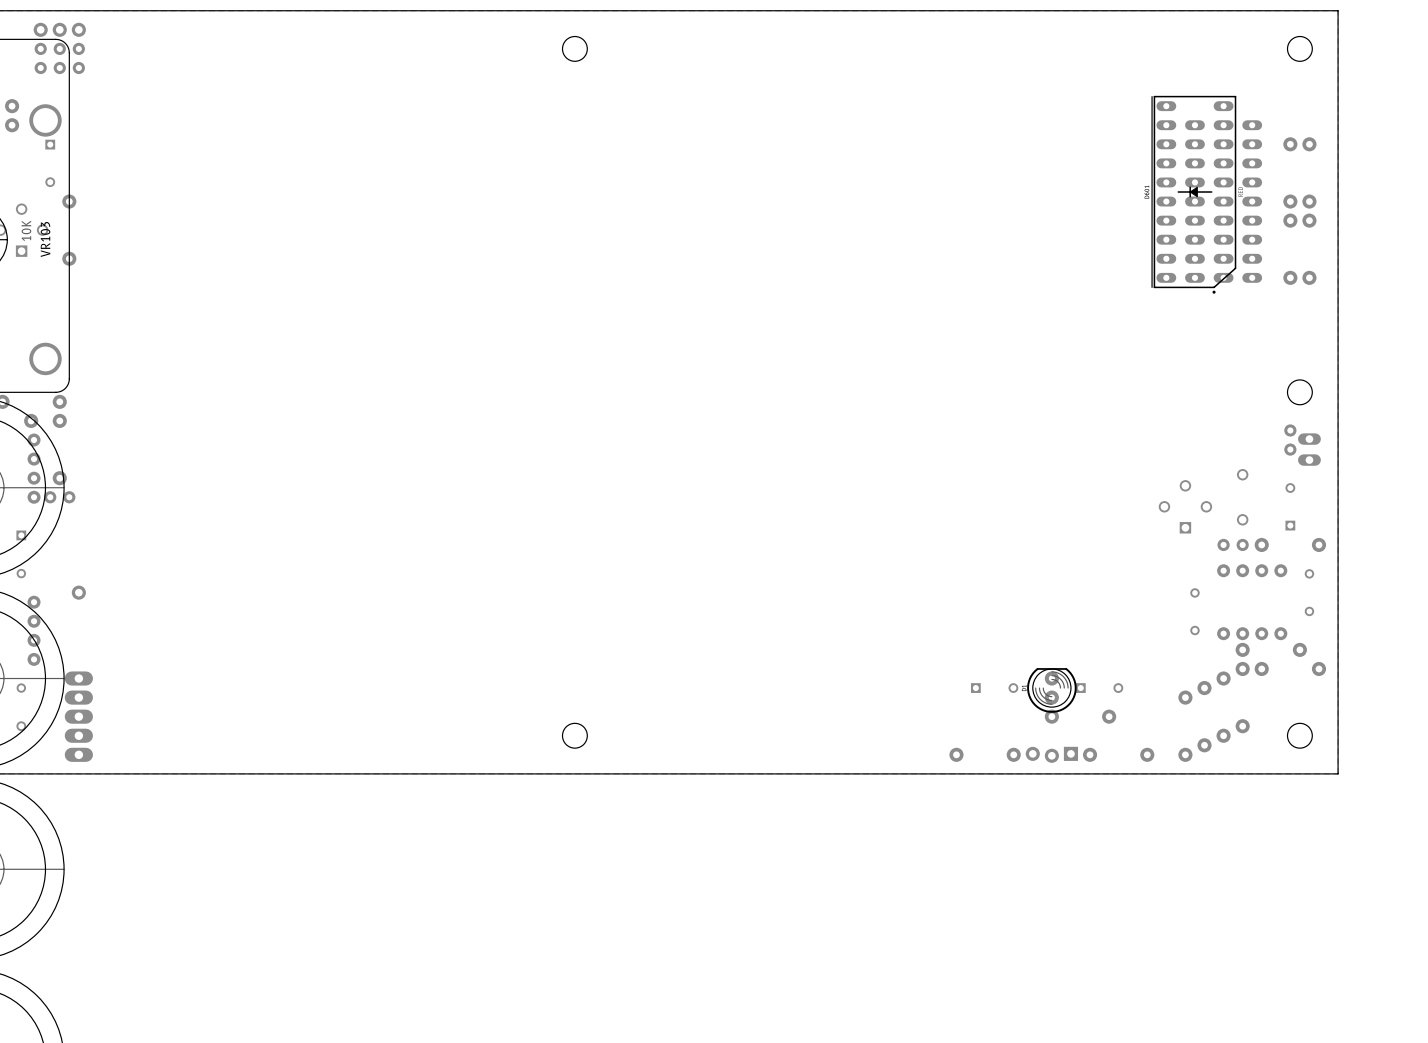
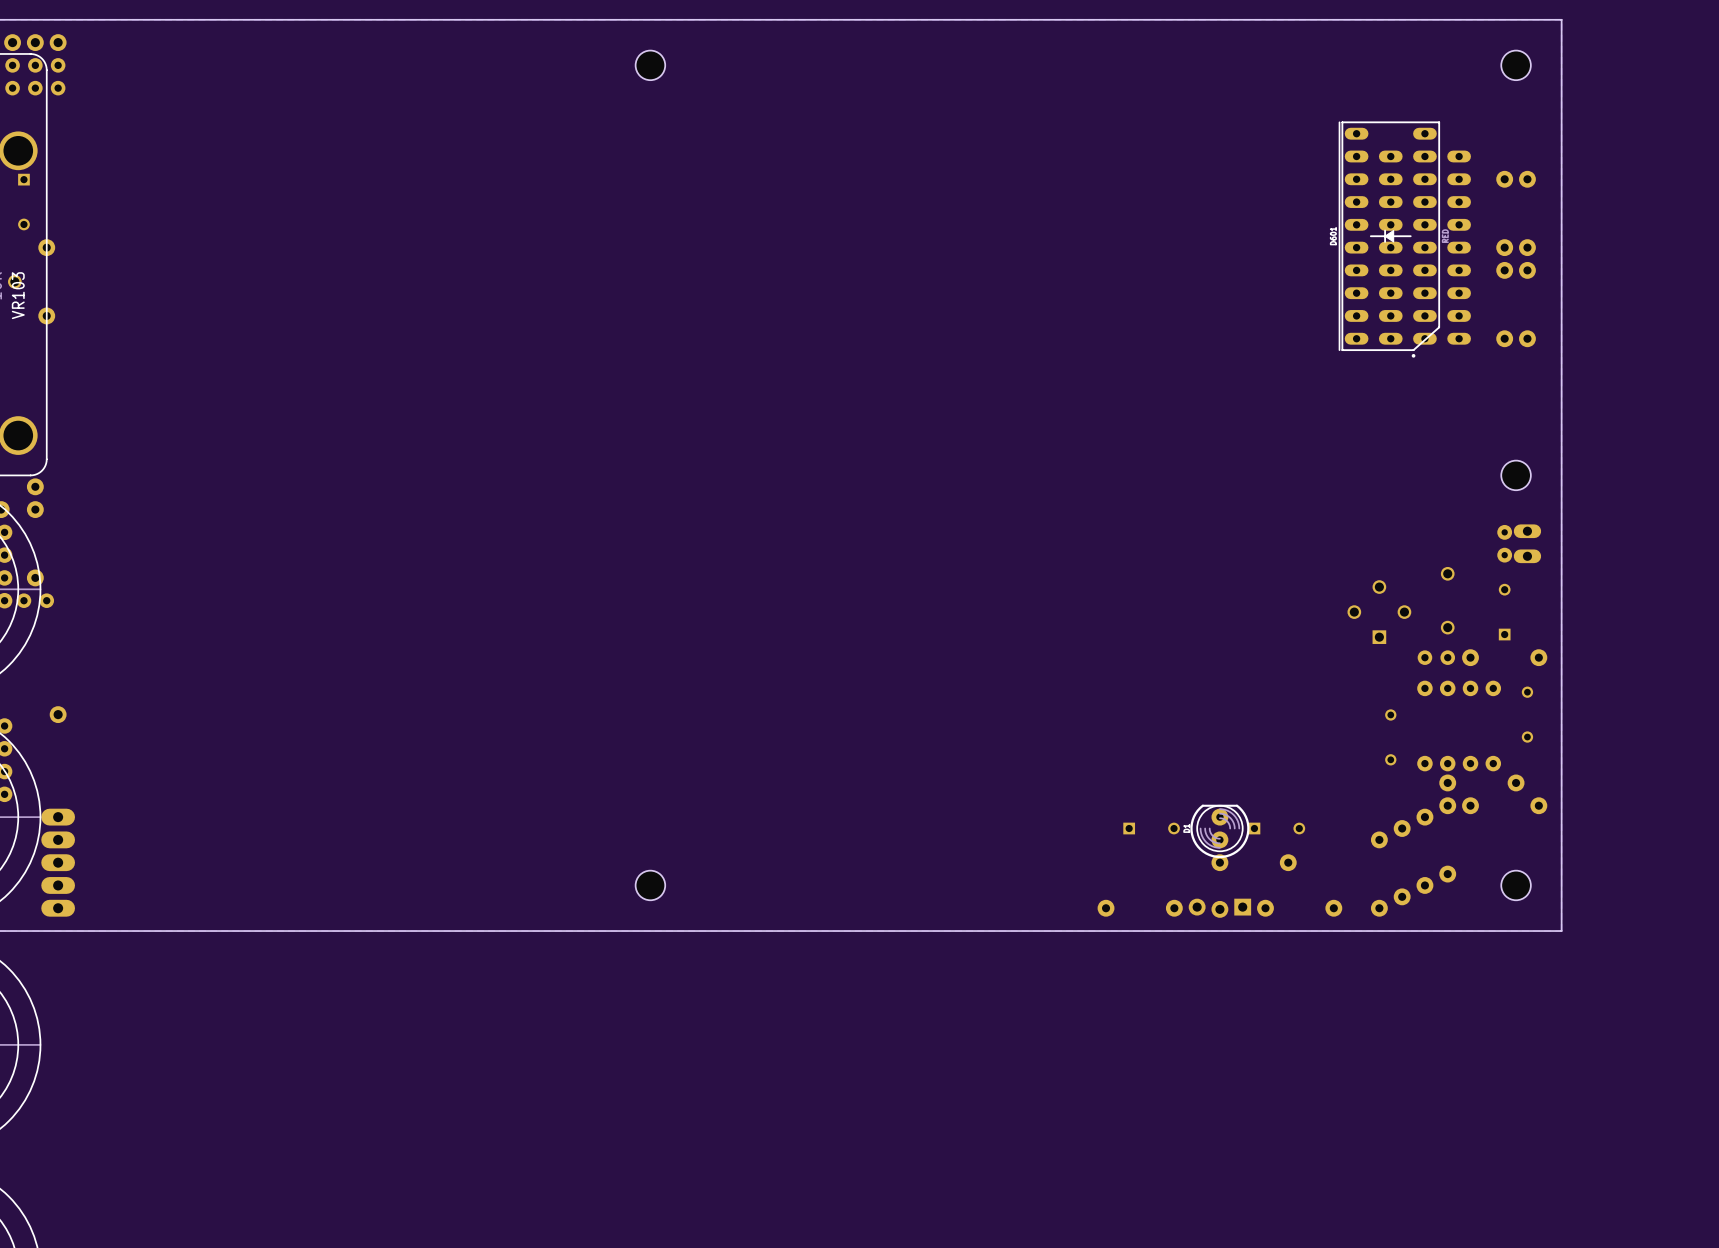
part: (1290, 440) -> none
part: none -> (1504, 543)

